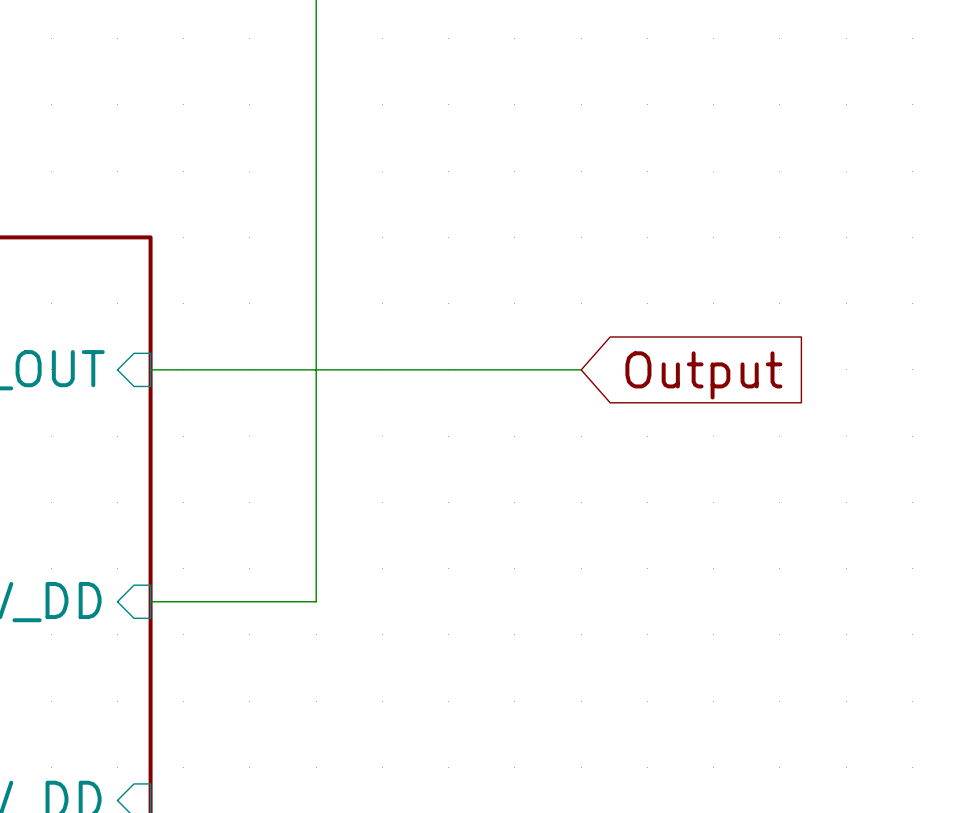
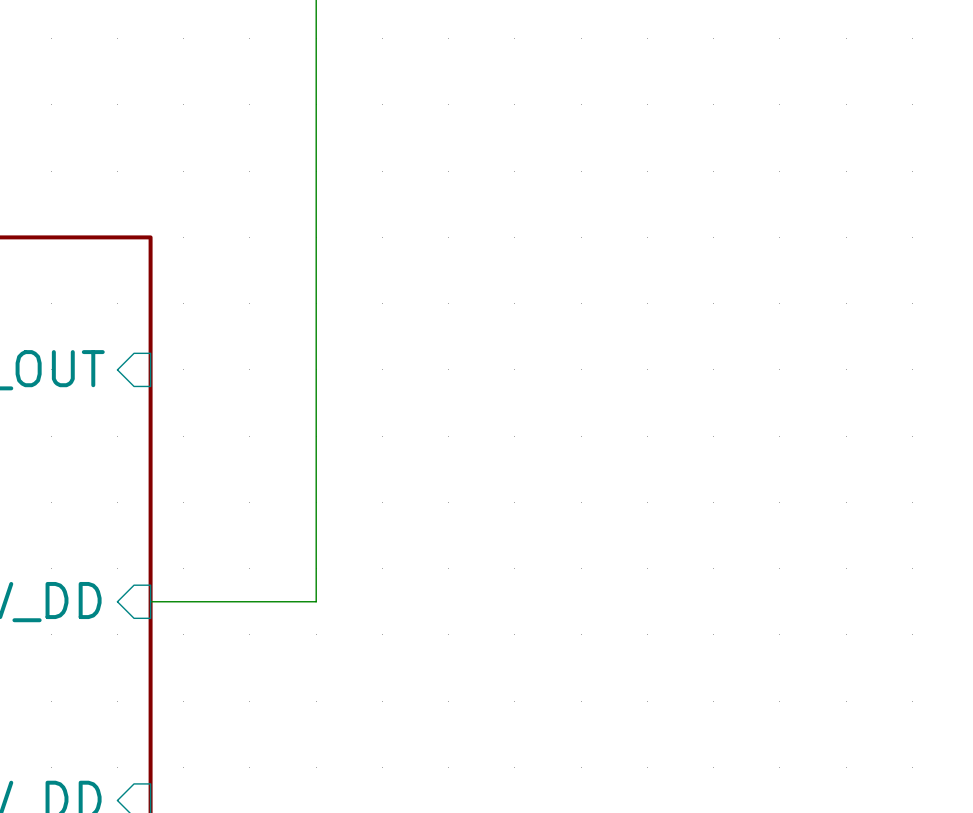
wire: (150, 369) (581, 369) -> none
global label: Output (703, 375) -> none

